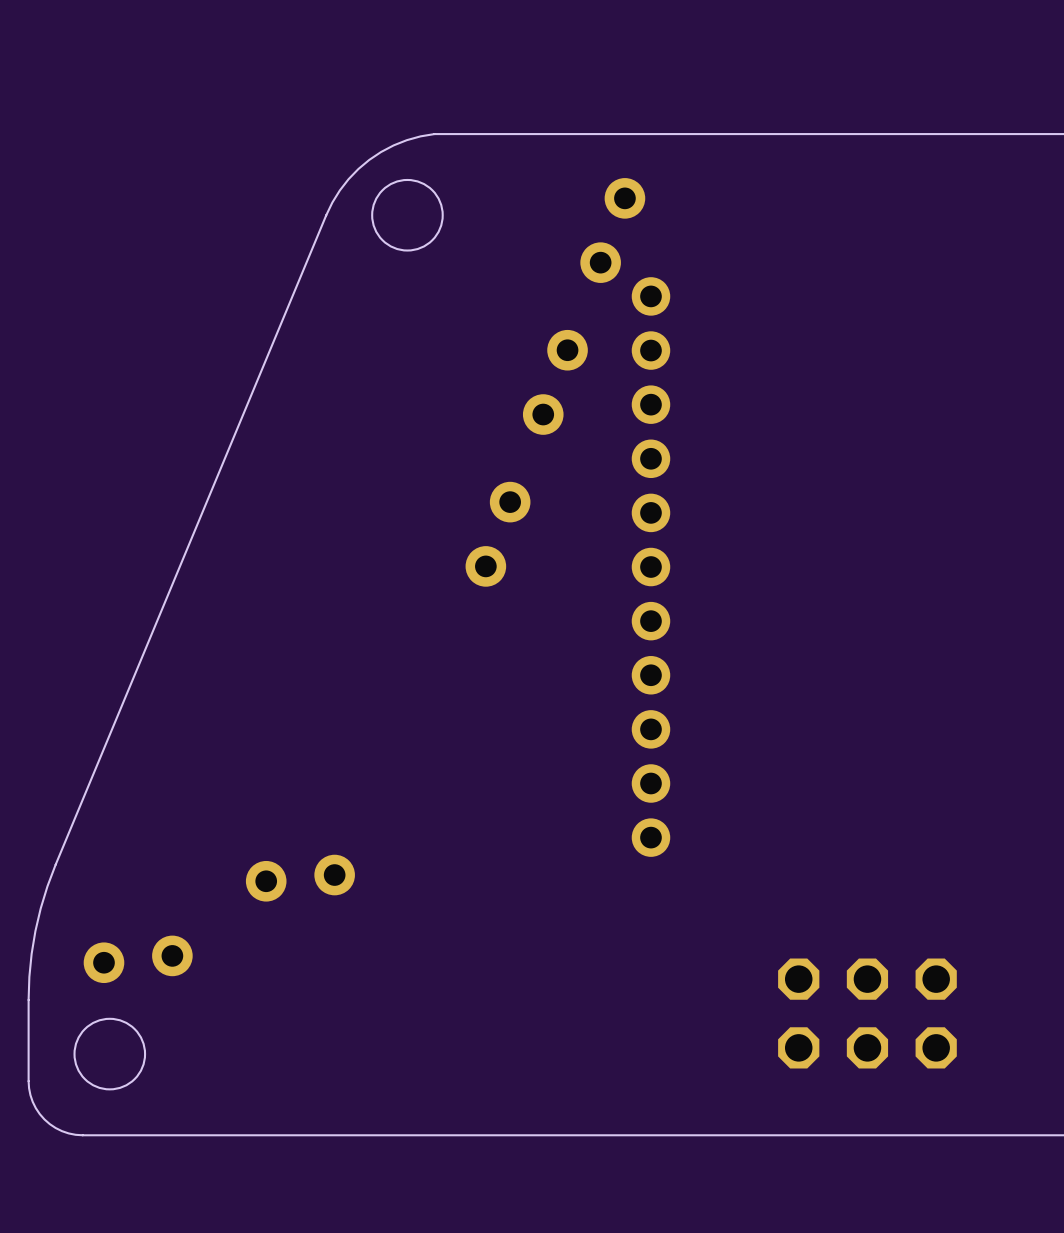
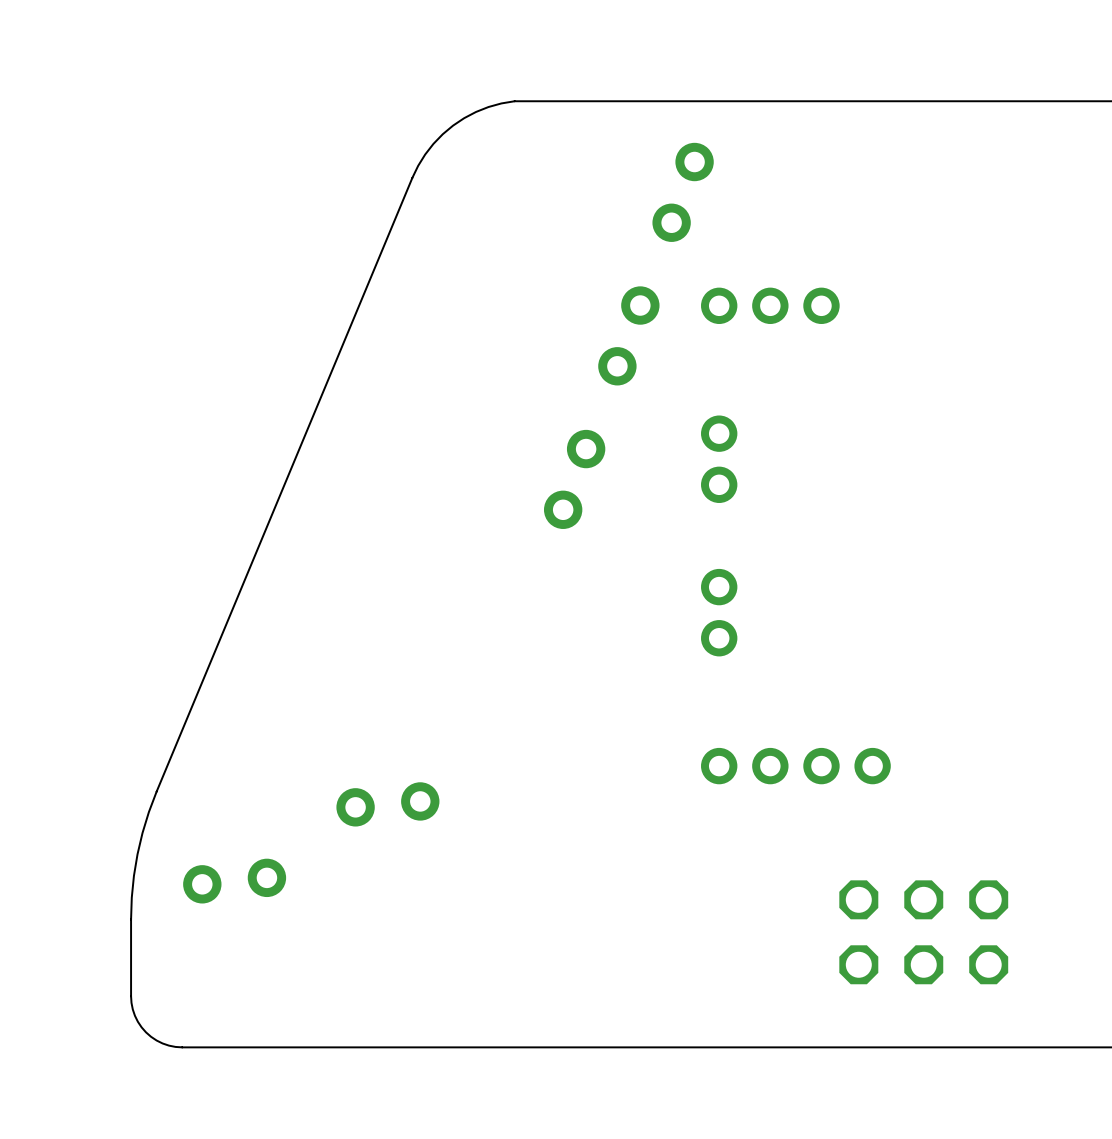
round board edge: [371, 178, 444, 252] -> none
part rotation: 0° (650, 350) -> 90° clockwise (770, 305)
part: (650, 458) -> none
part: none -> (719, 433)
part: (650, 512) -> none
part: none -> (719, 484)
part position: (650, 594) -> (719, 612)
part rotation: 0° (650, 756) -> 90° clockwise (795, 766)
round board edge: [73, 1017, 147, 1091] -> none

